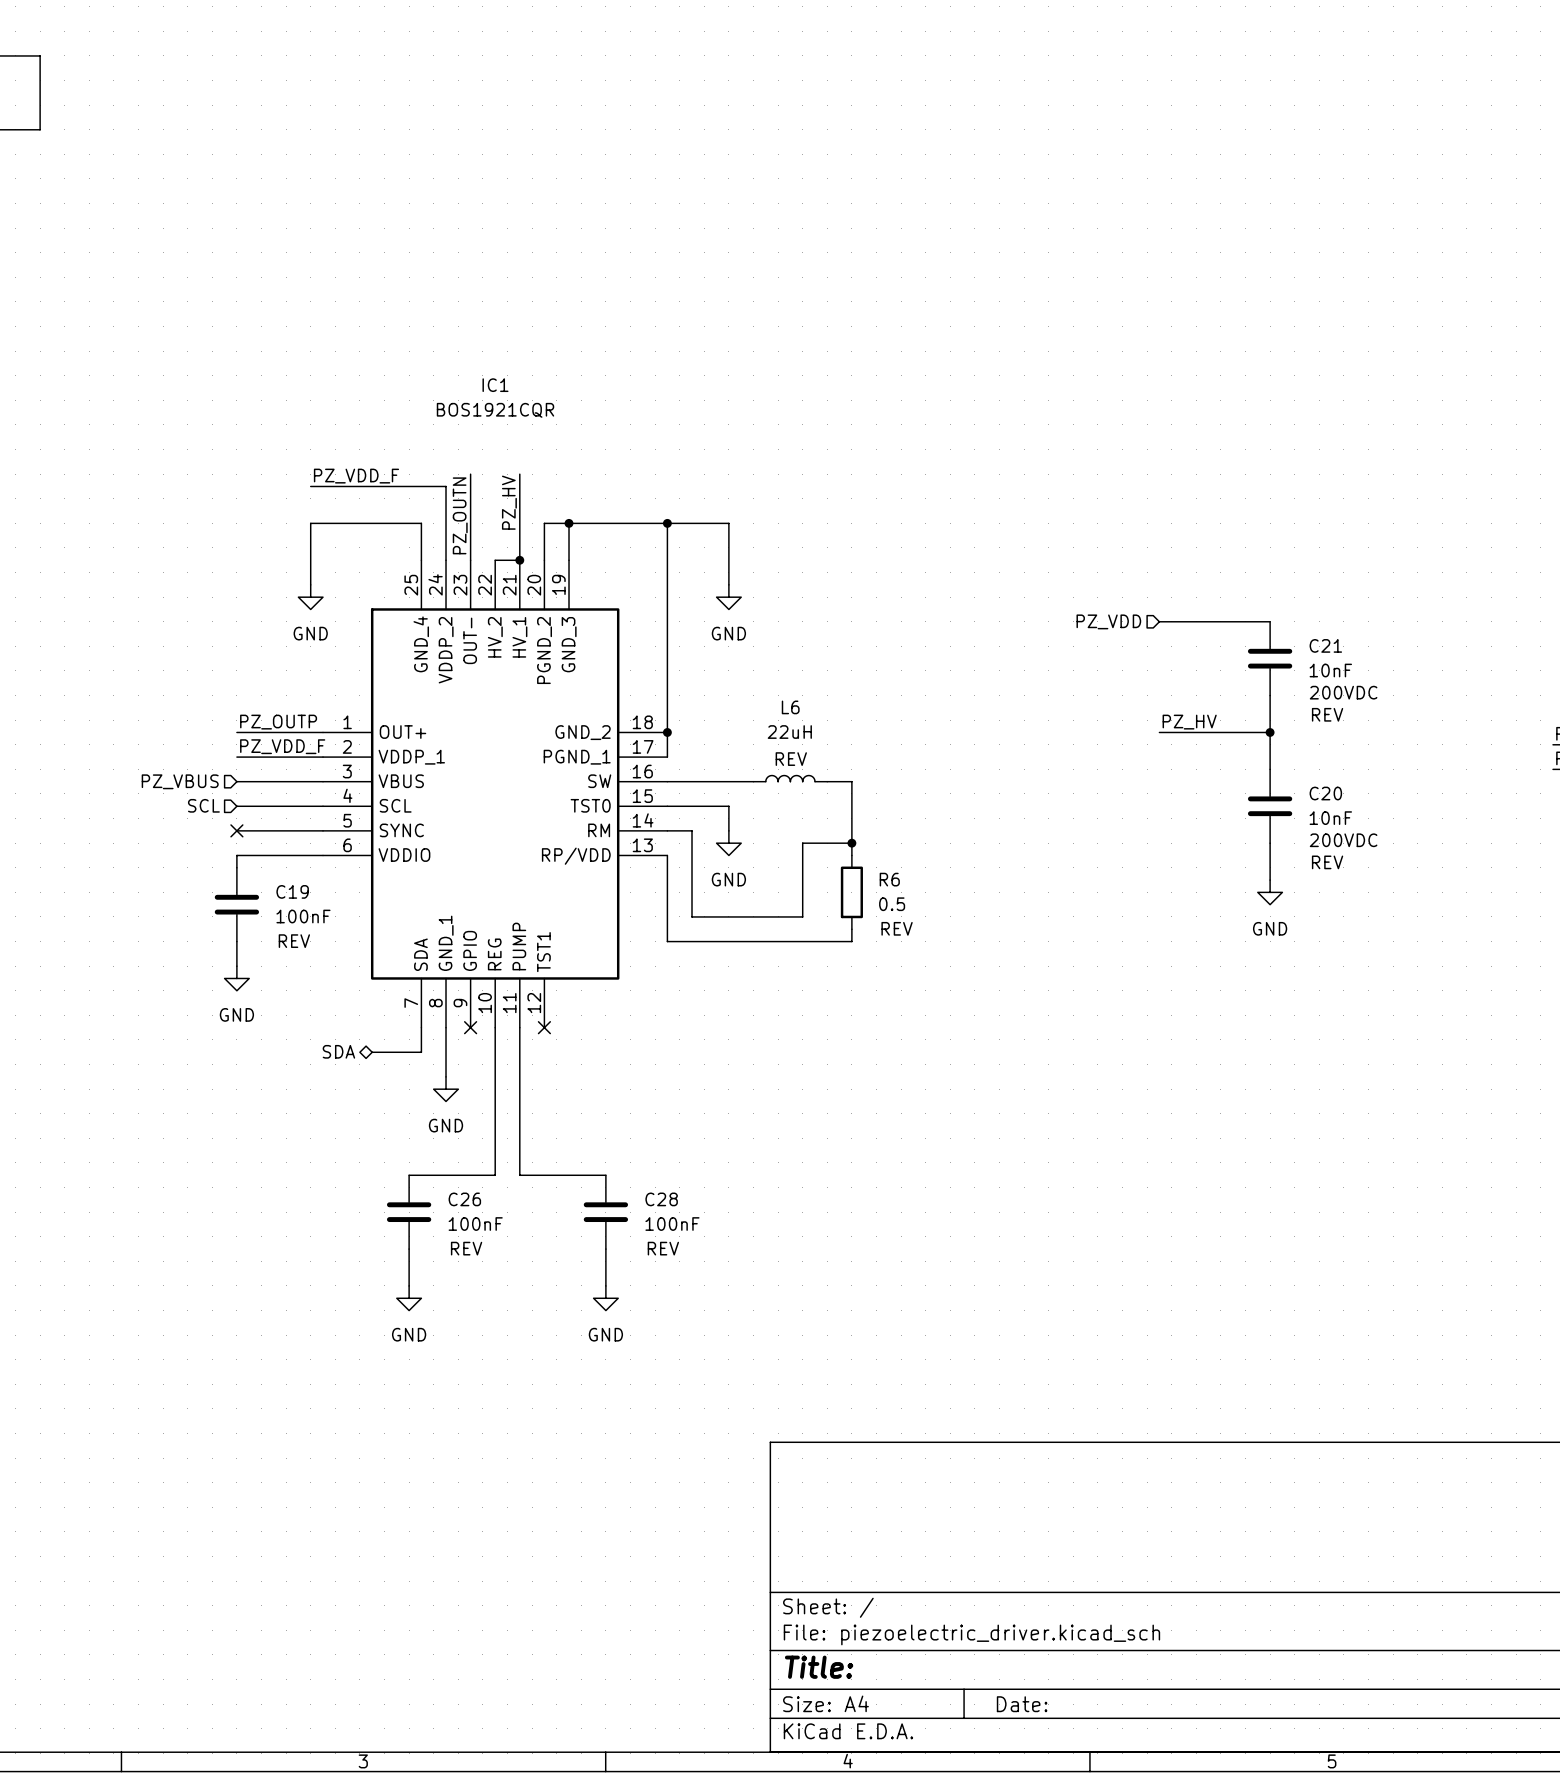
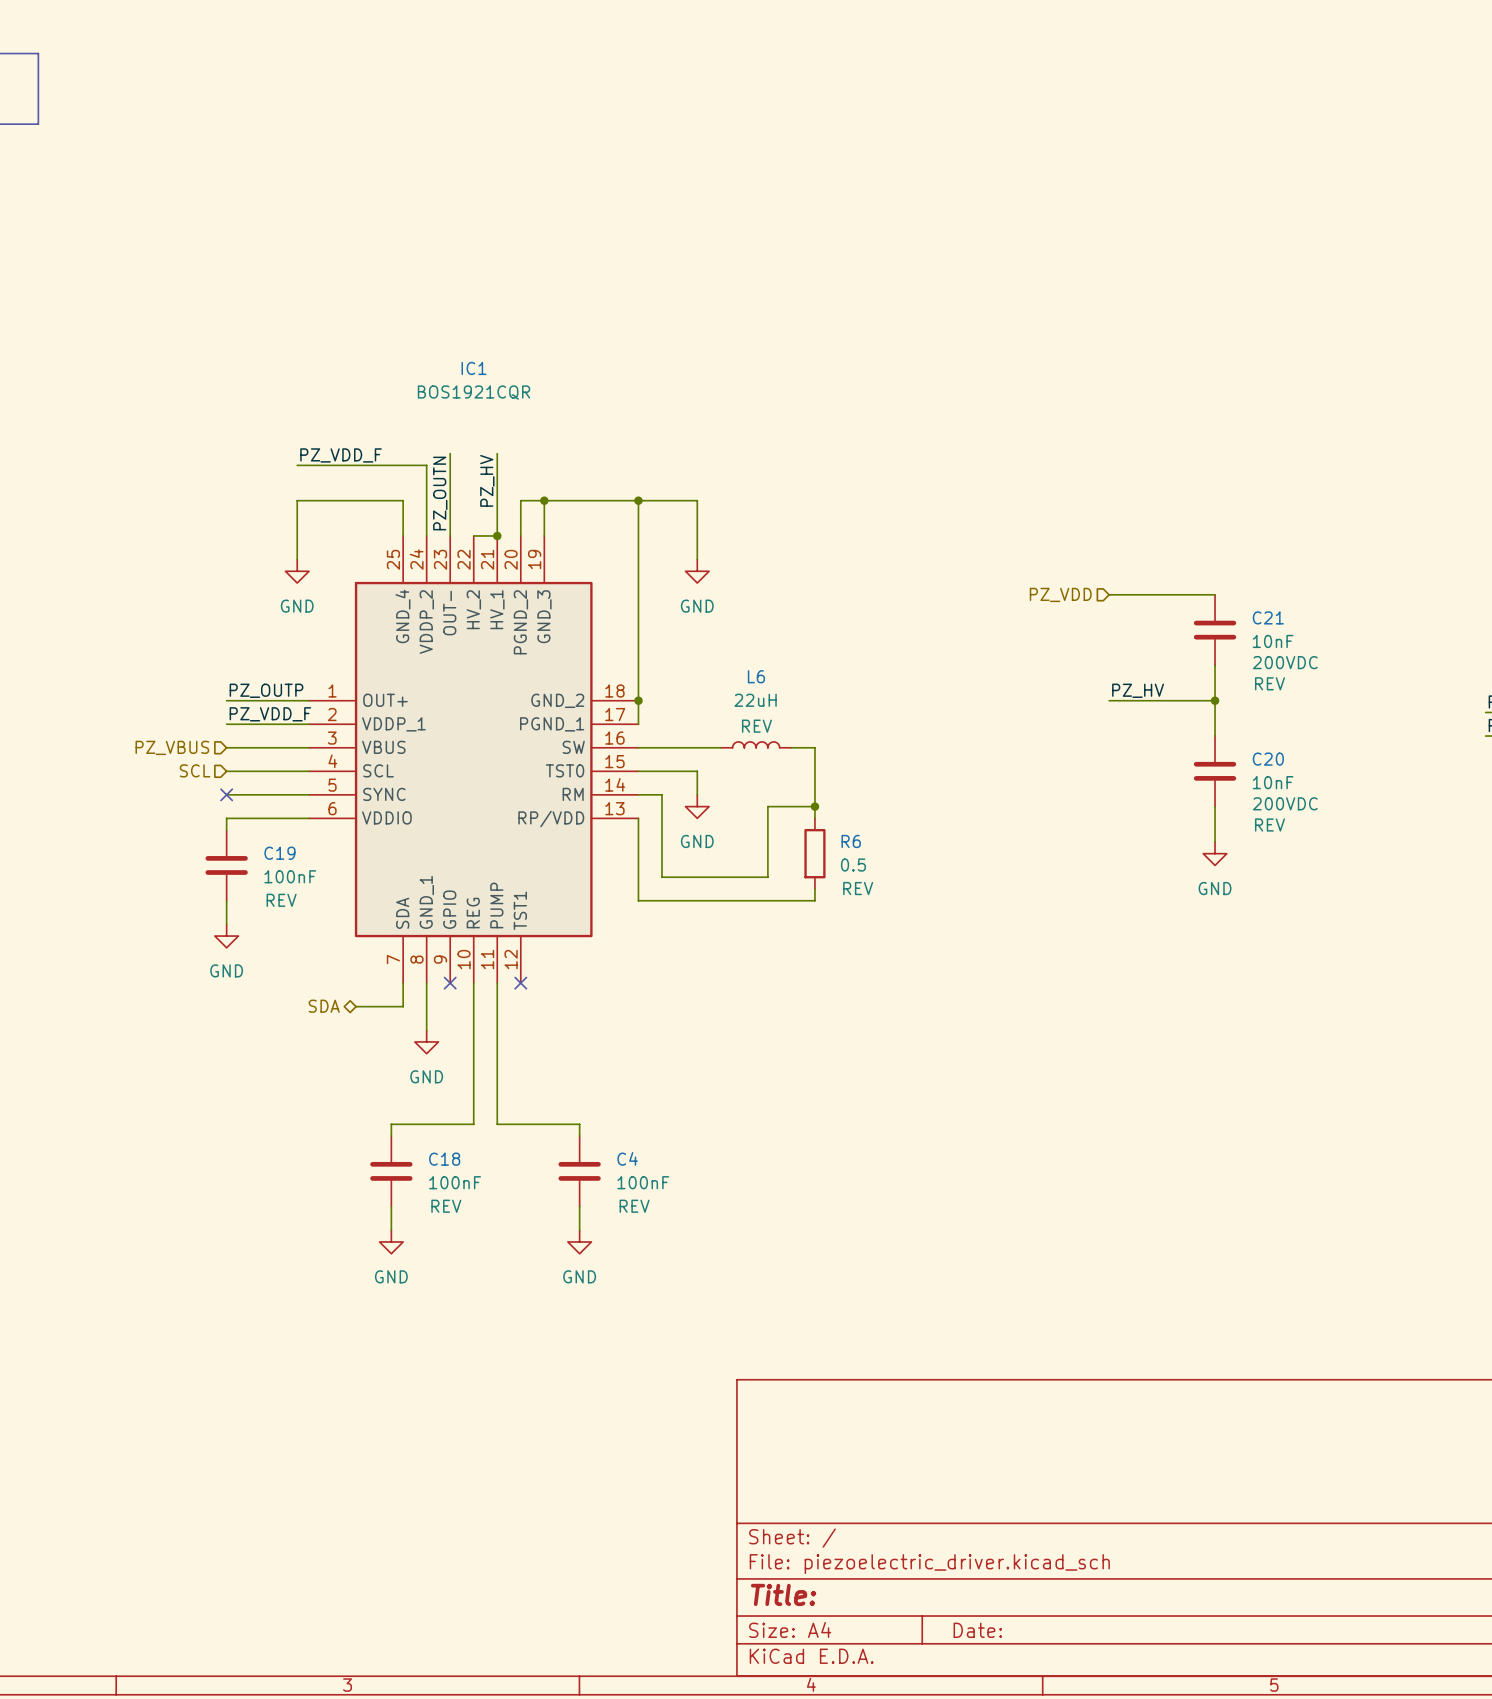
C26: 100nF (409, 1212) -> none
C28: 100nF (605, 1212) -> none
C18: none -> 100nF (391, 1171)
C4: none -> 100nF (579, 1171)

